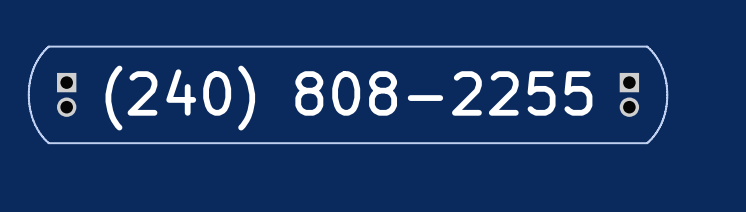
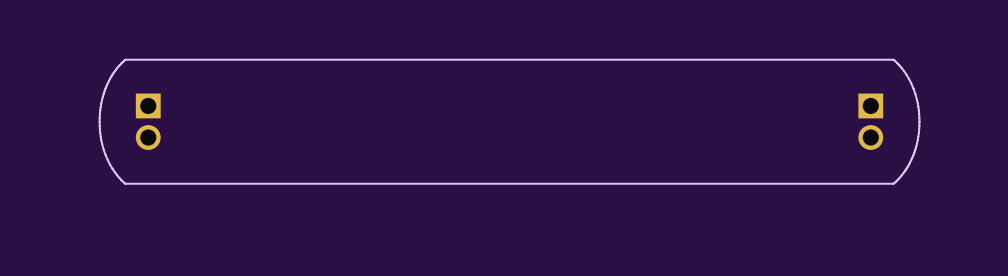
text: (240) 808-2255 (348, 98) -> none

